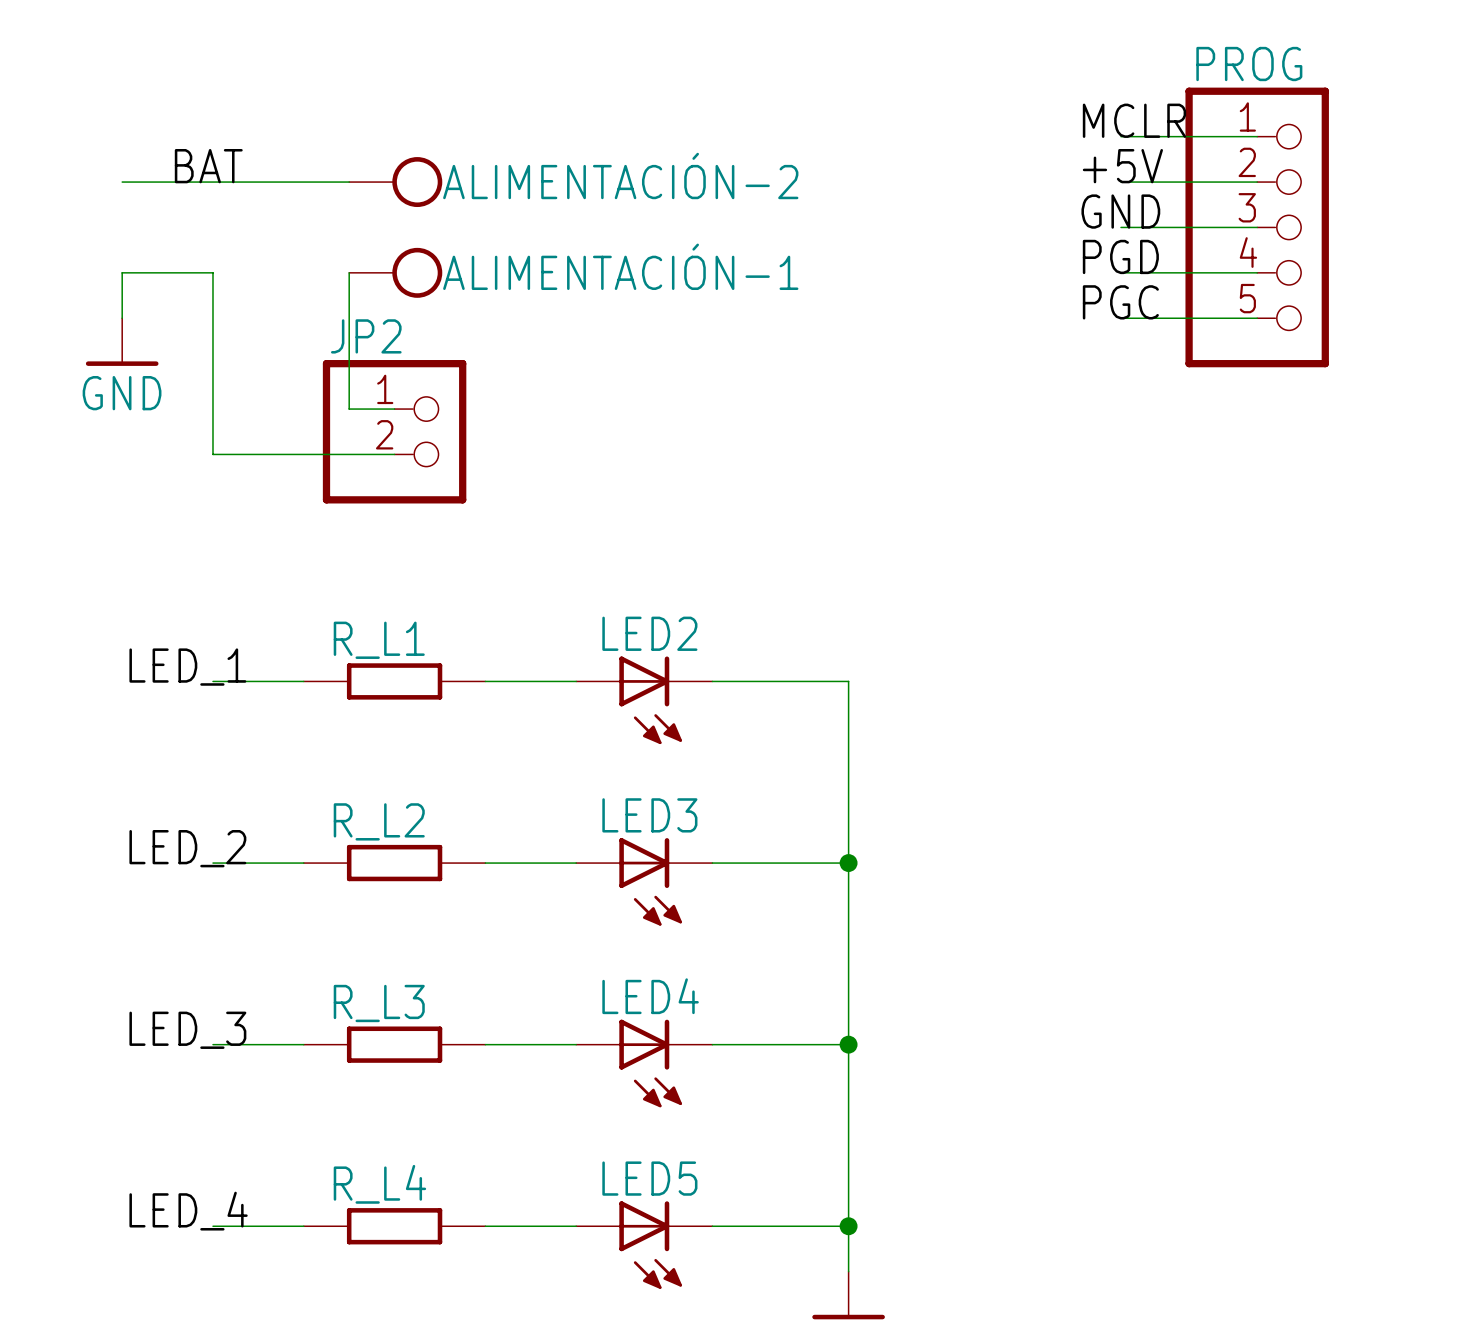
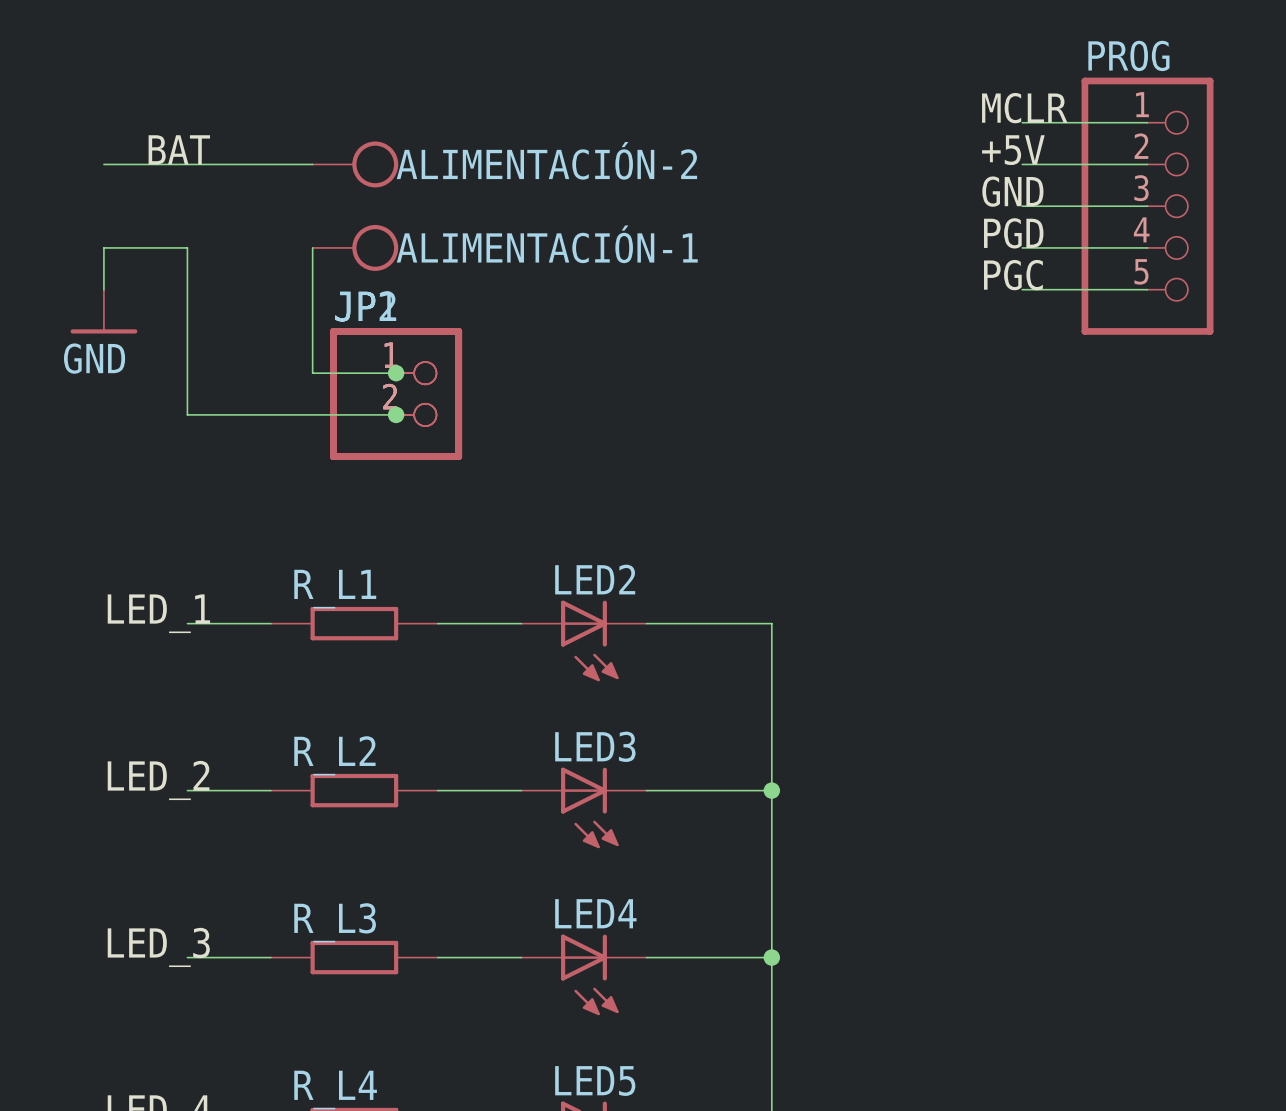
wire: none -> (354, 373) (396, 373)
junction: none -> (396, 373)
JP2 position: (394, 431) -> (396, 394)
part: none -> (396, 394)
wire: none -> (354, 414) (396, 414)
junction: none -> (396, 414)

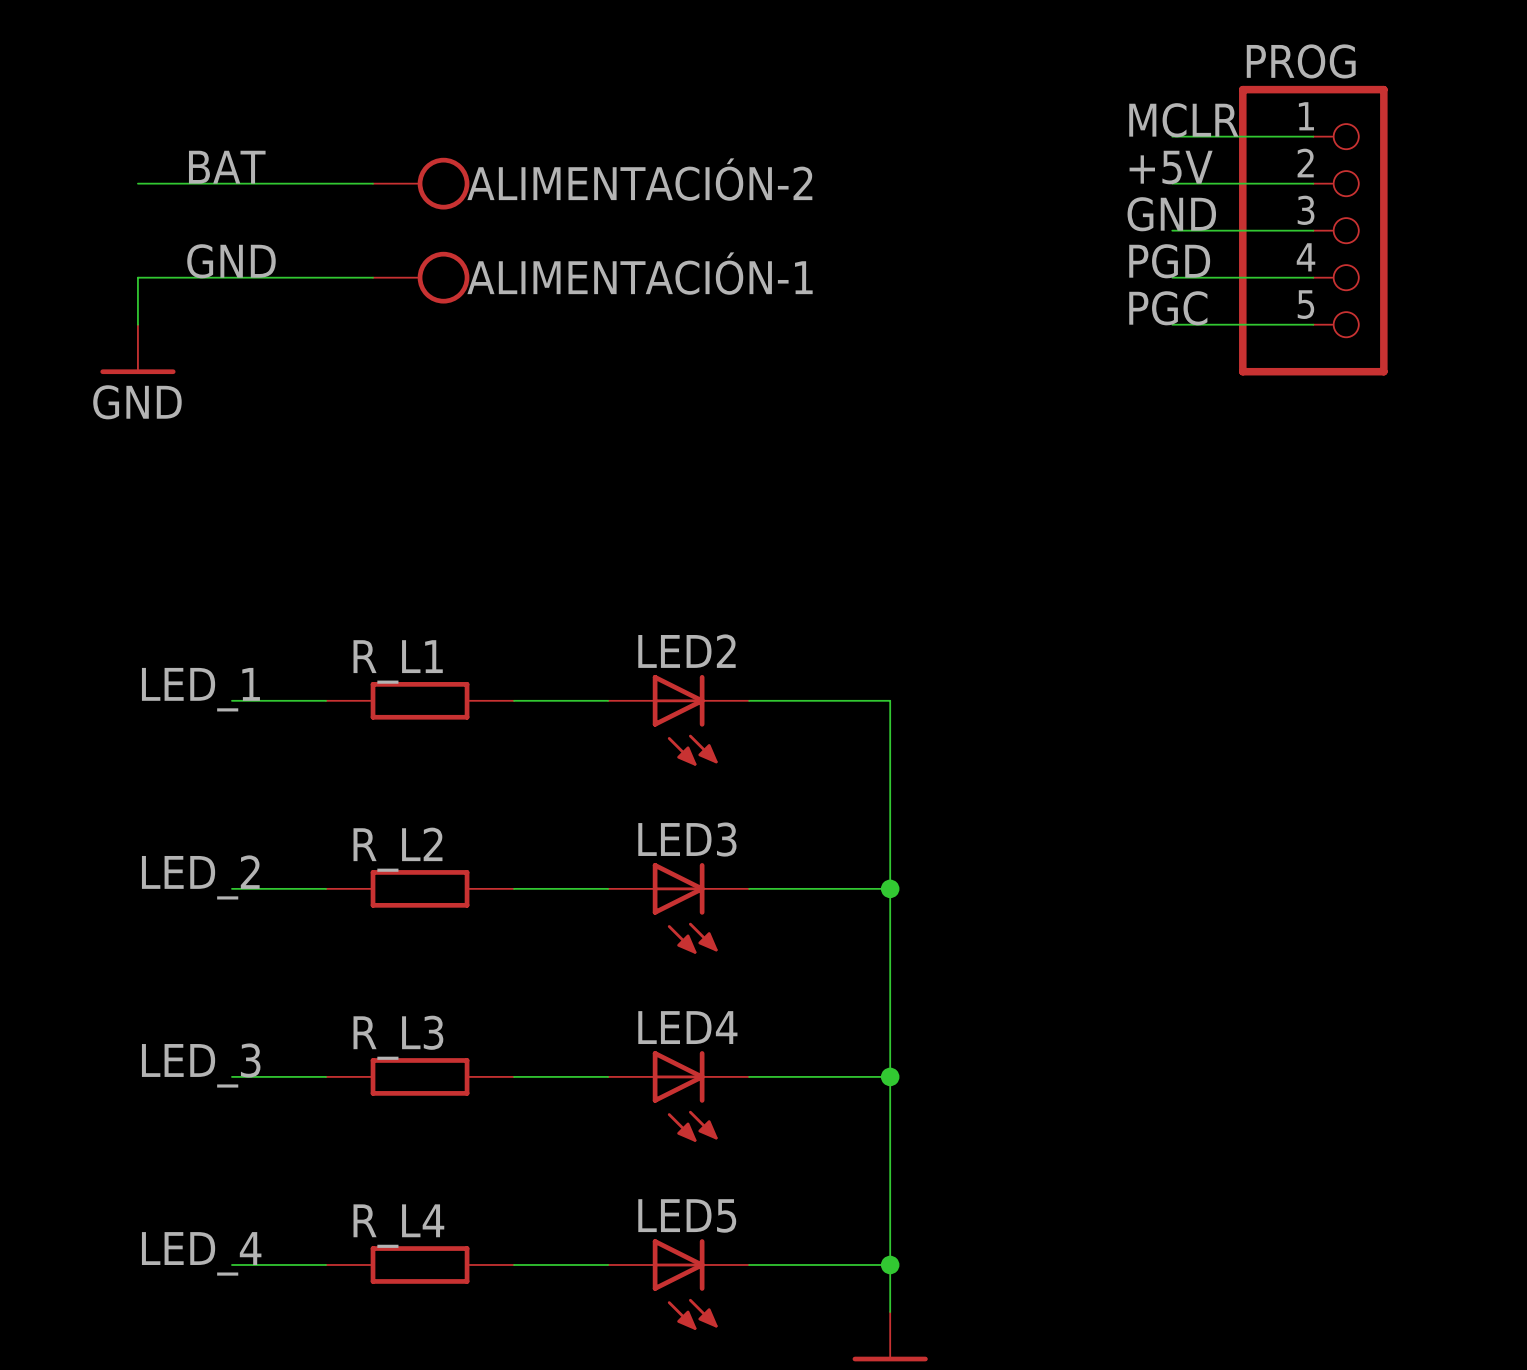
label: none -> GND (231, 261)
wire: (187, 247) (187, 414) (396, 414) -> (231, 277) (373, 277)
wire: (312, 247) (312, 373) (396, 373) -> none
junction: (396, 373) -> none
part: (396, 394) -> none
part: (396, 394) -> none
junction: (396, 414) -> none

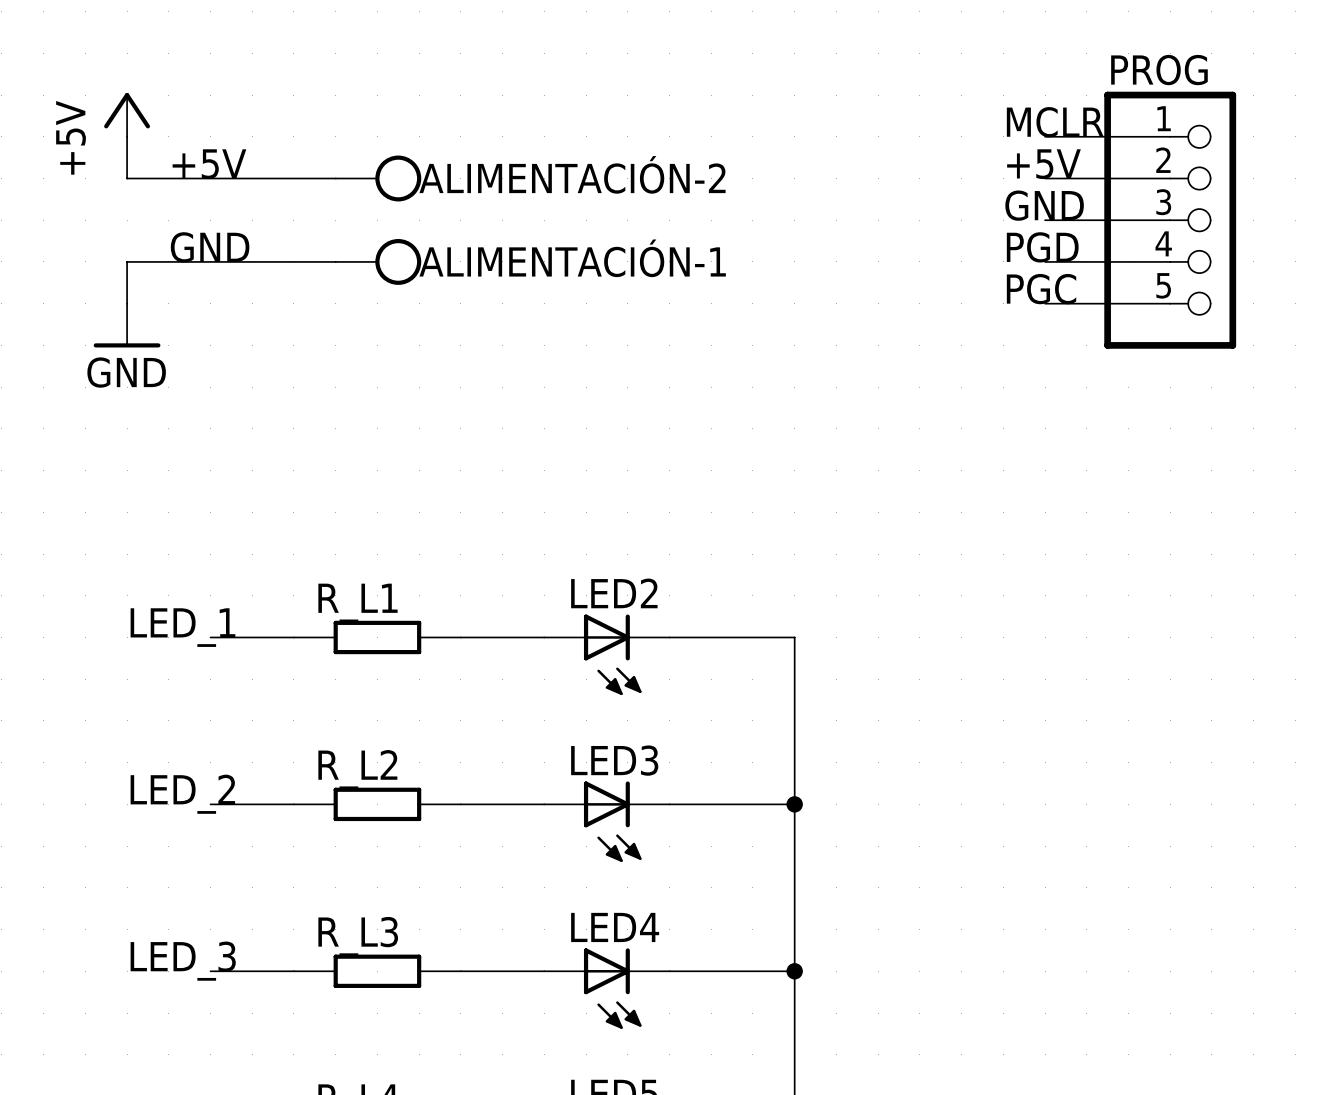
power symbol: none -> +5V (127, 114)
wire: none -> (127, 136) (127, 178)
label: BAT (227, 167) -> +5V (209, 164)

